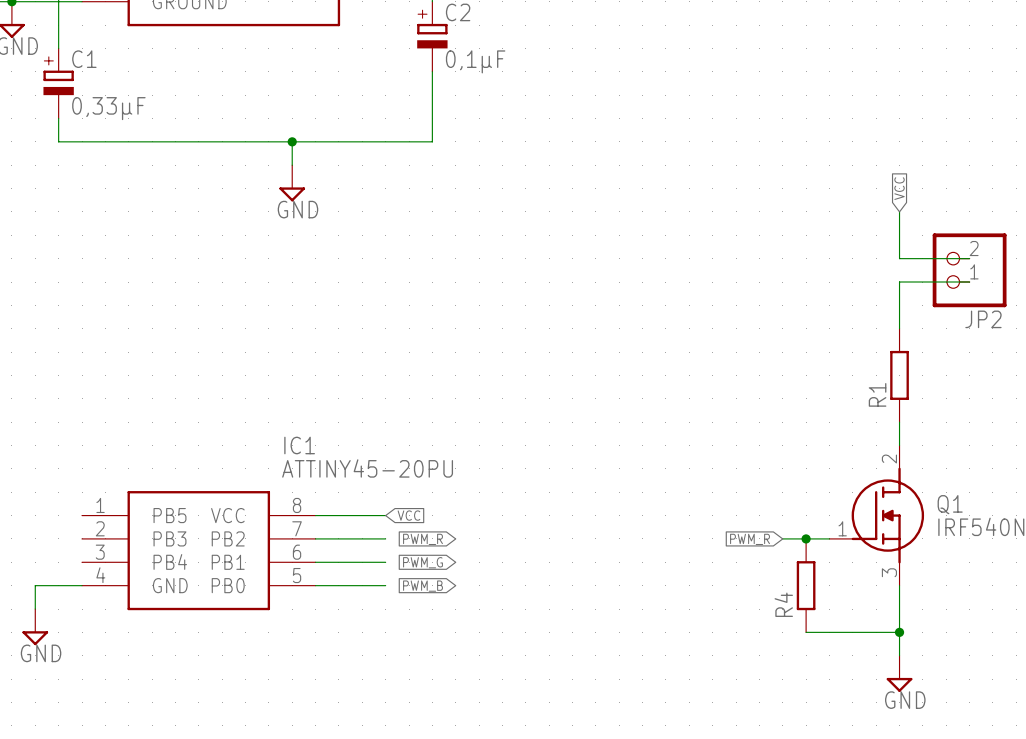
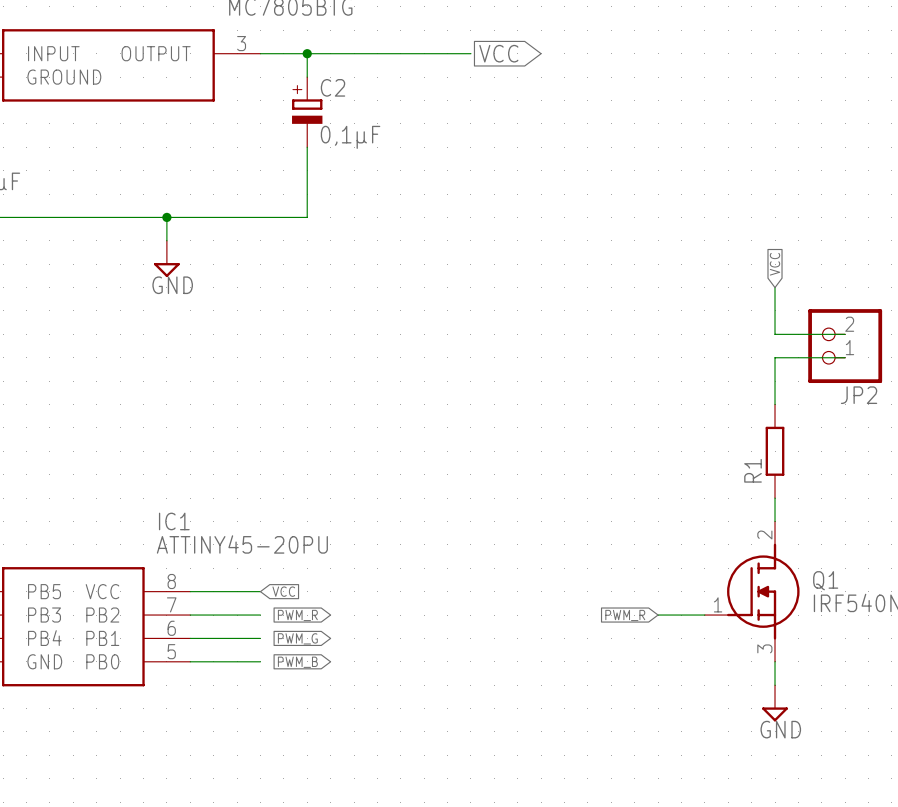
junction: (806, 538) -> none
R4: (806, 585) -> none
wire: (806, 632) (899, 632) -> none
junction: (899, 632) -> none
power symbol position: GND (899, 673) -> GND (775, 703)

